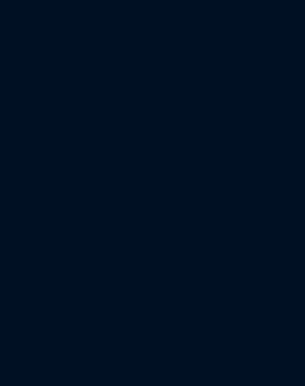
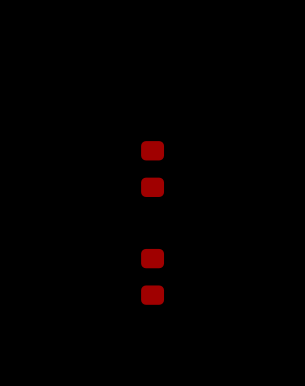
part: none -> (152, 169)
part: none -> (152, 276)

